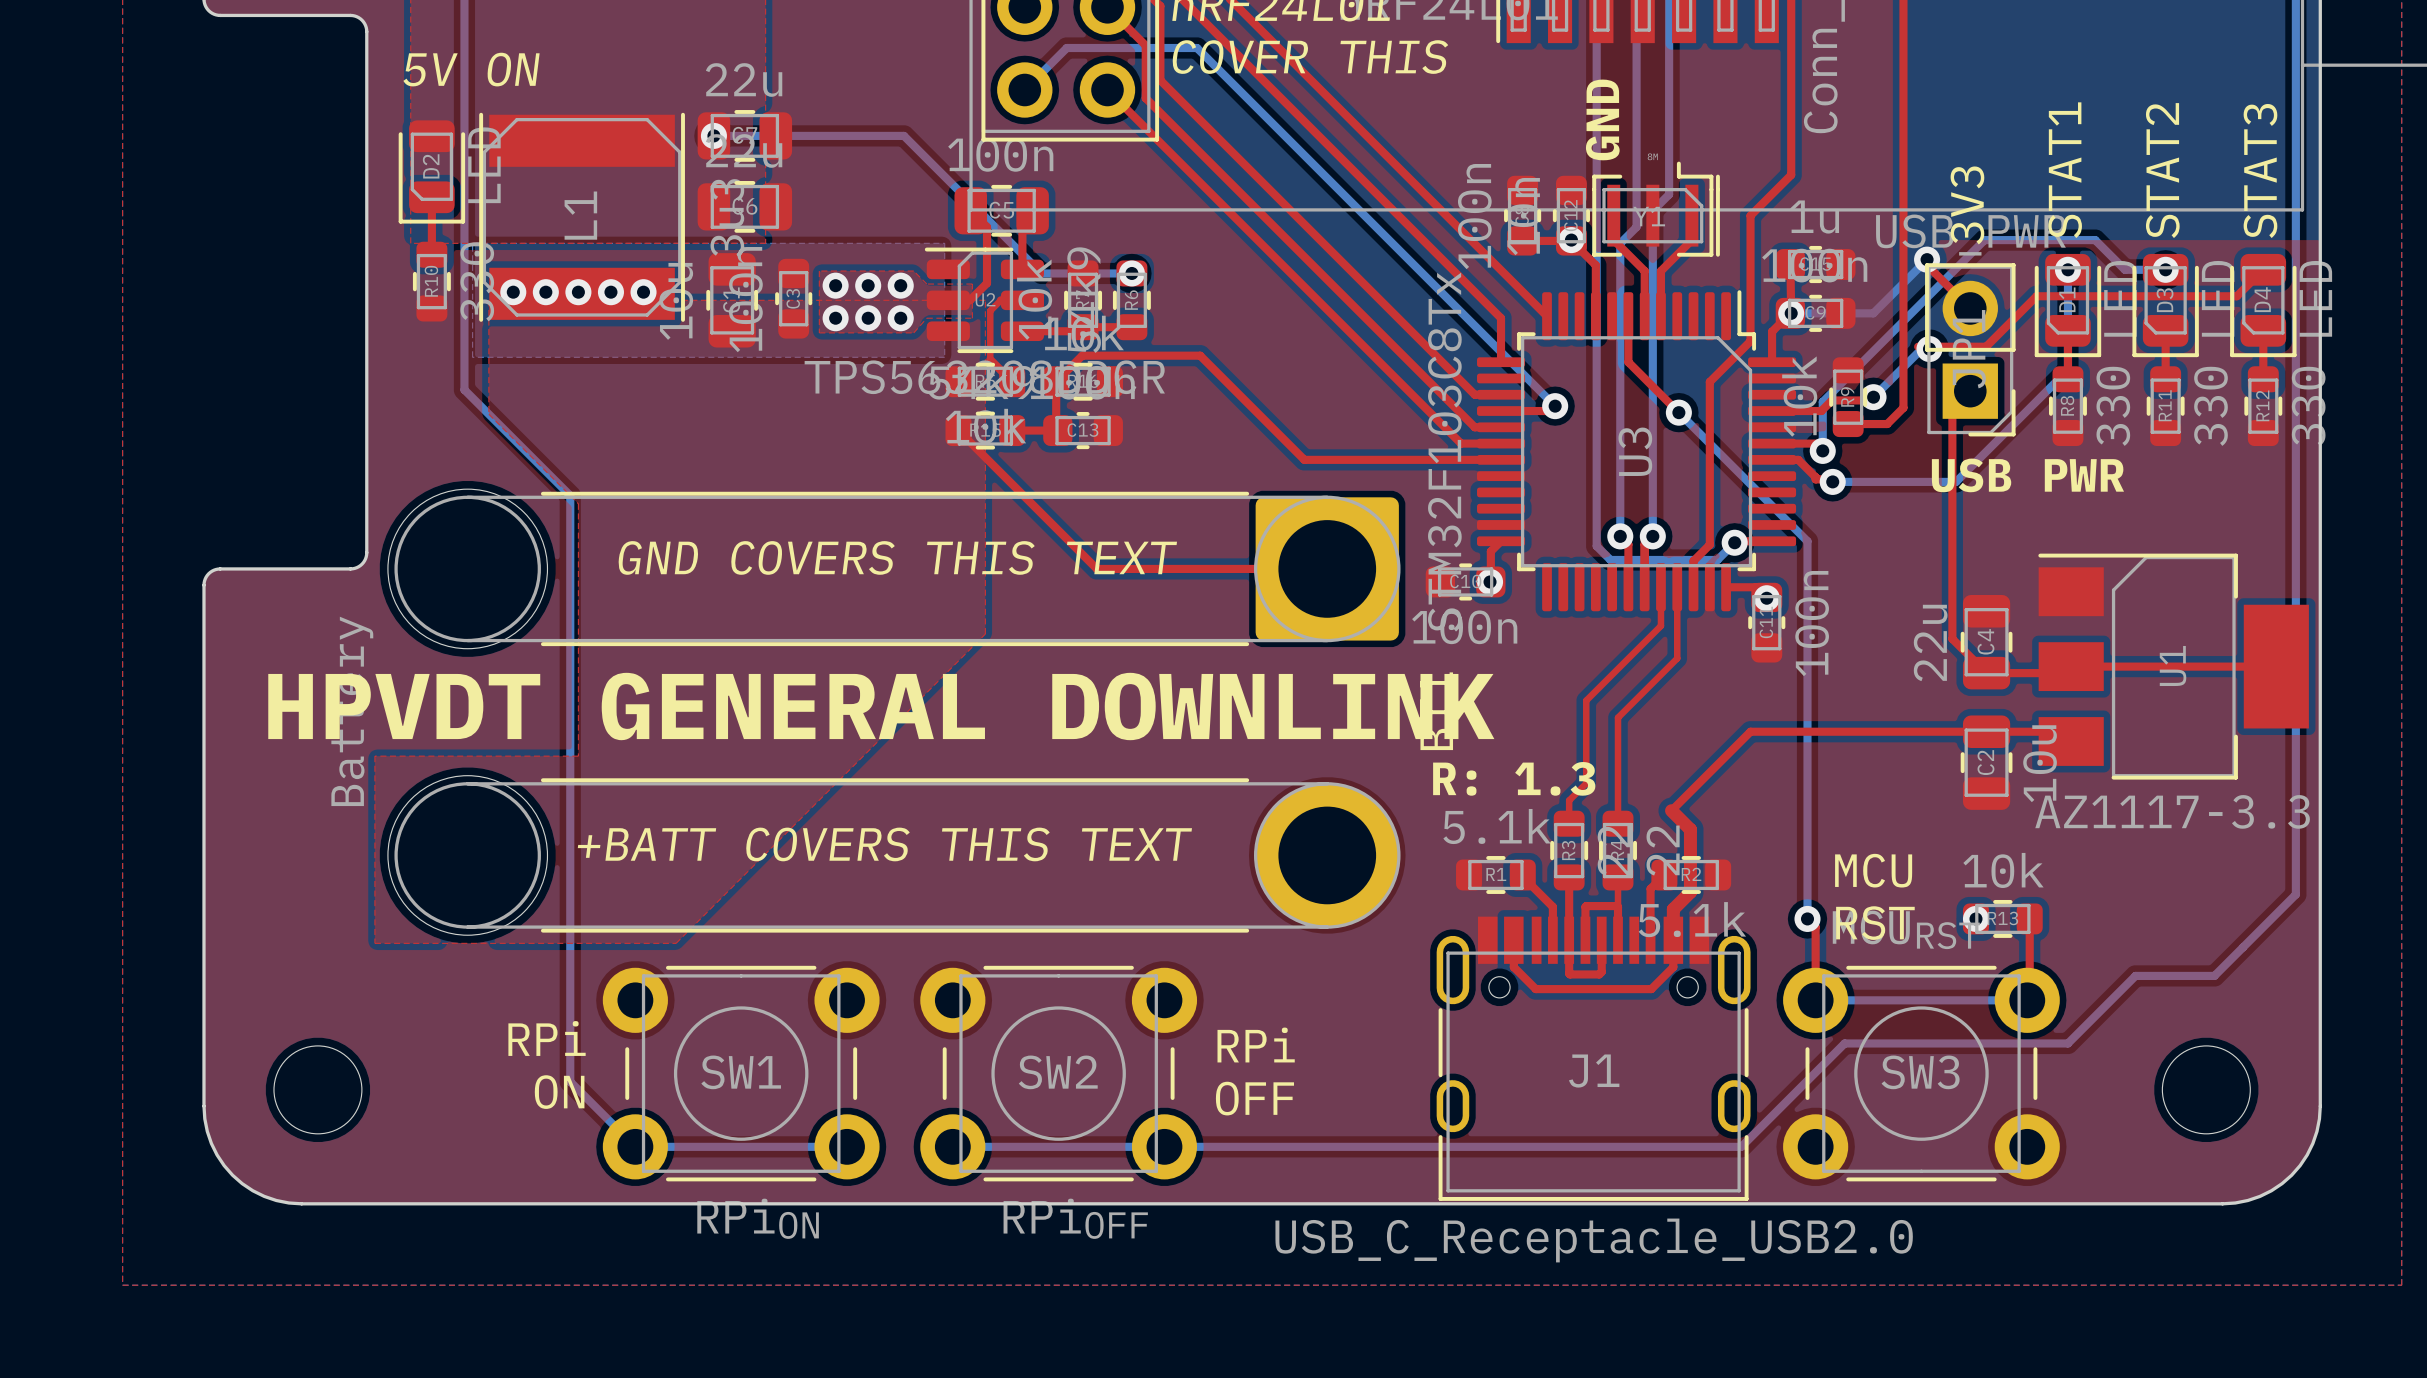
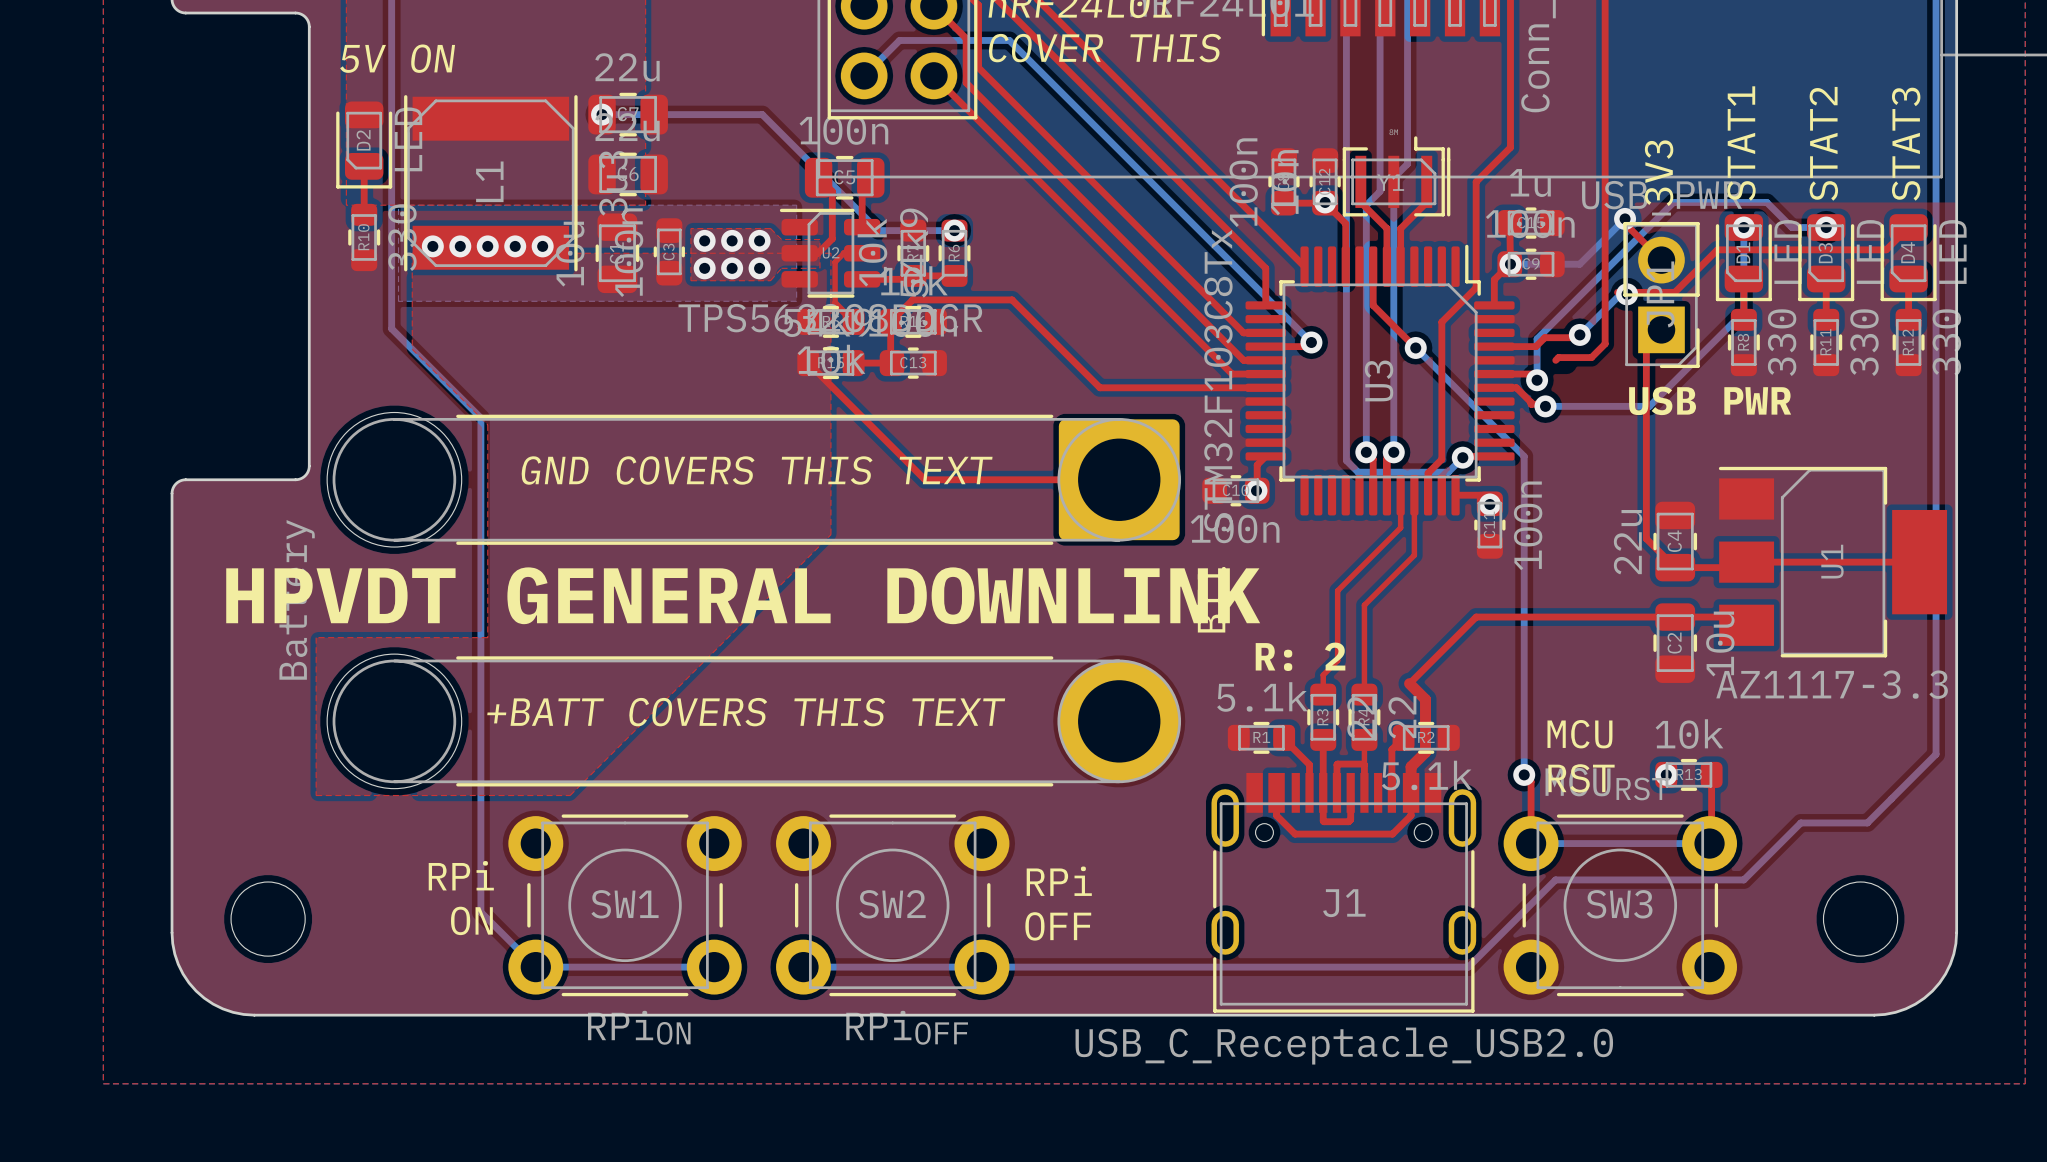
text: GND (1602, 119) -> none
R9: 10k (1848, 397) -> none
text: R: 1.3 (1514, 778) -> R: 2 (1300, 656)

